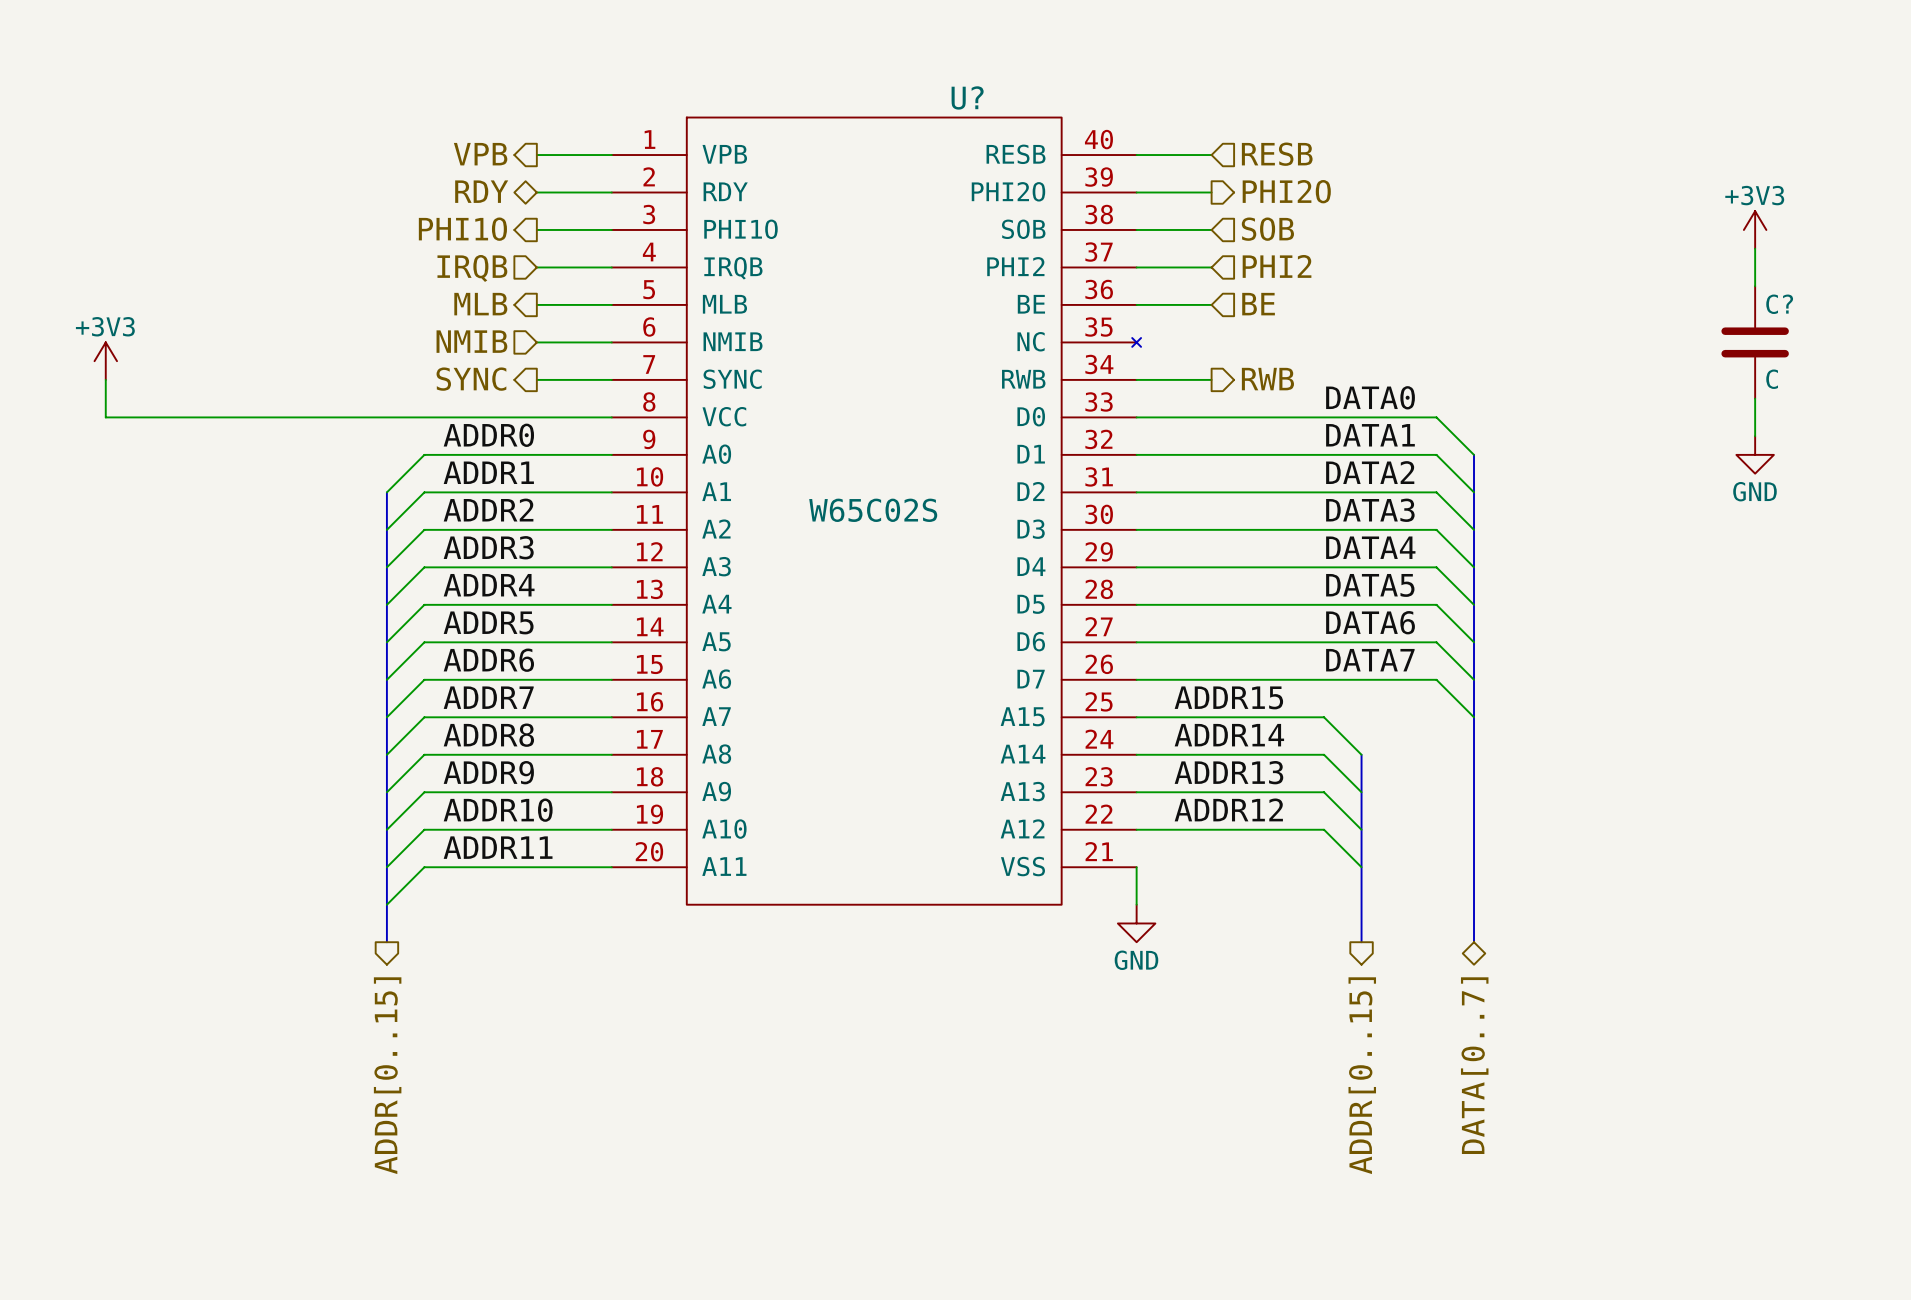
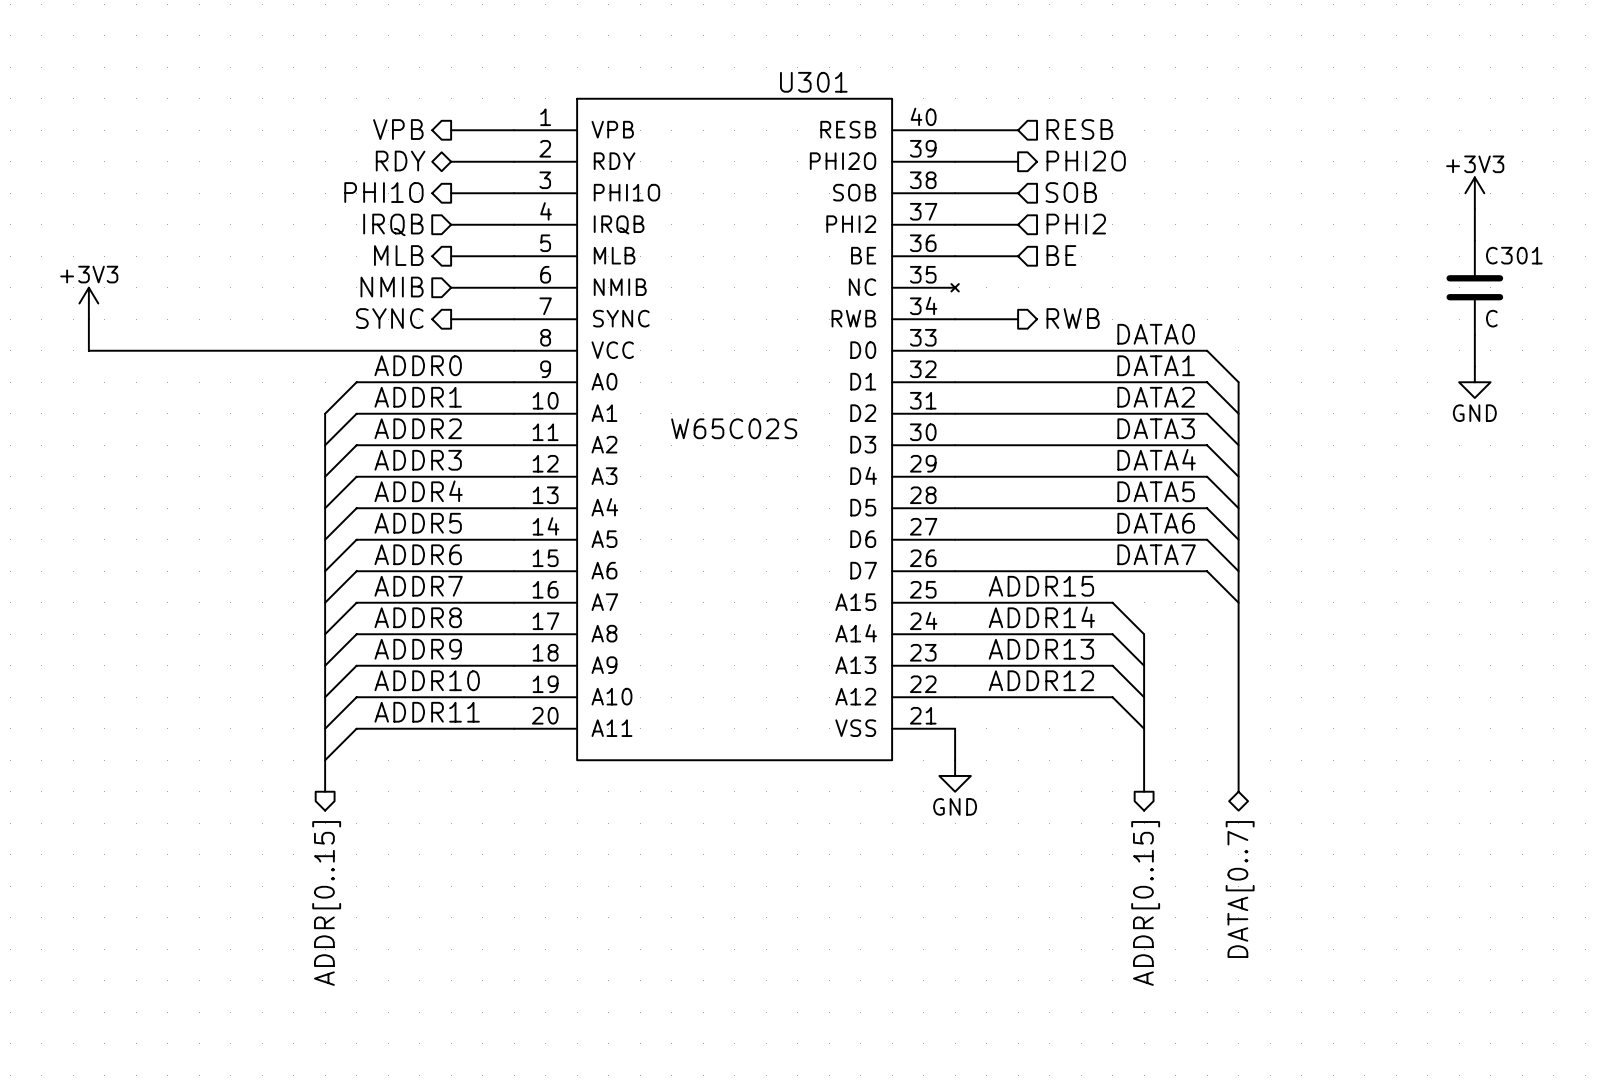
U? name: U? (967, 97) -> U301 (813, 82)
C? name: C? (1779, 304) -> C301 (1514, 255)

